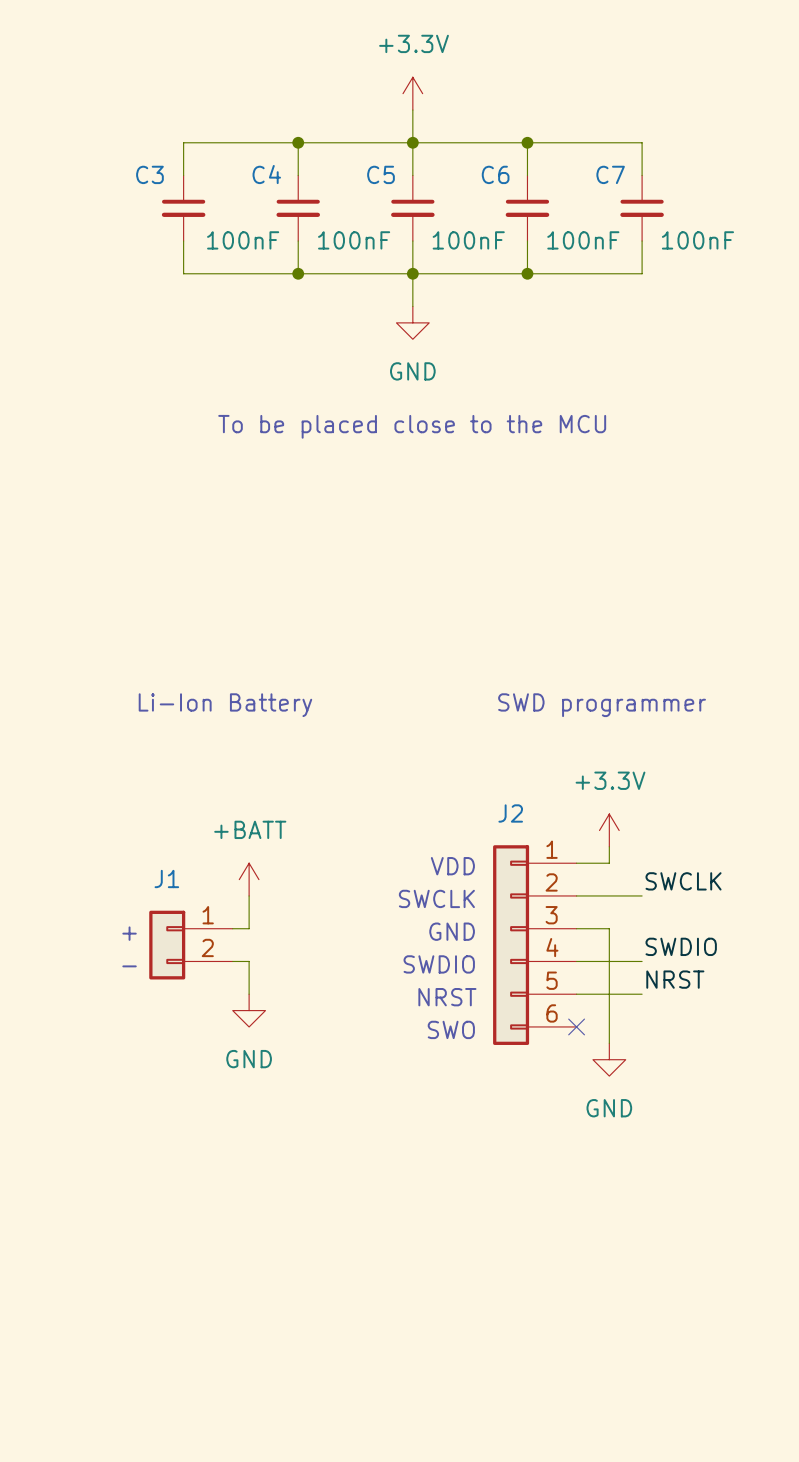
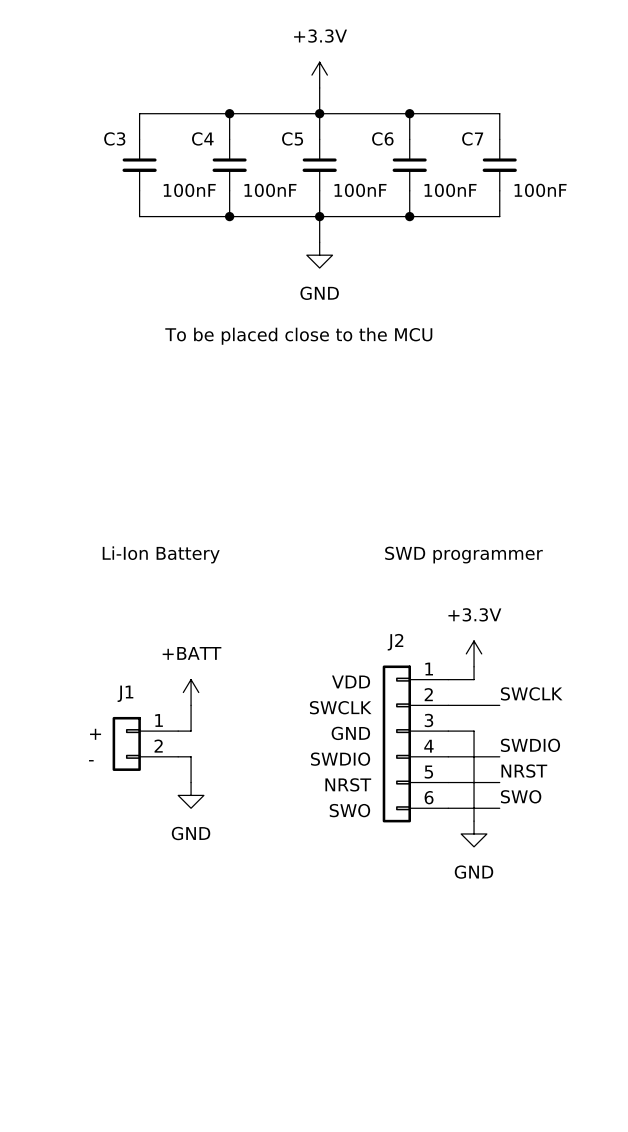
label: none -> SWO (521, 796)
wire: none -> (448, 808) (499, 808)
no-connect mark: (576, 1026) -> none

